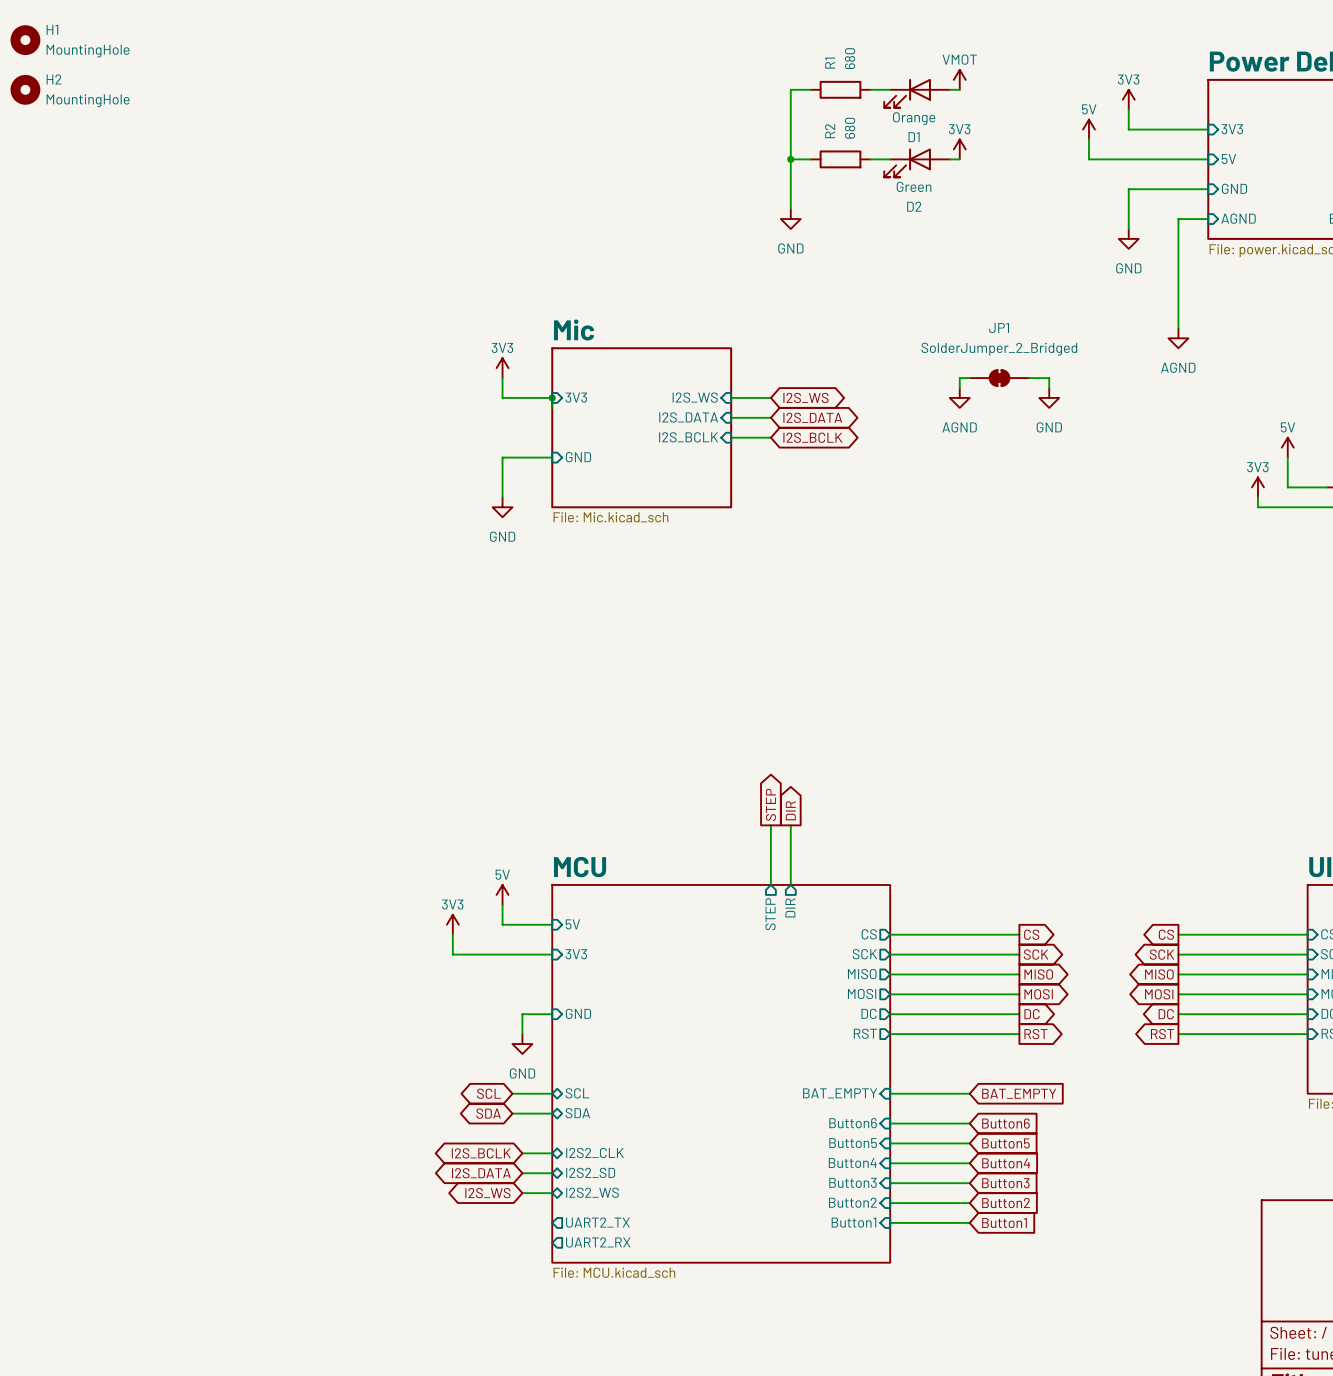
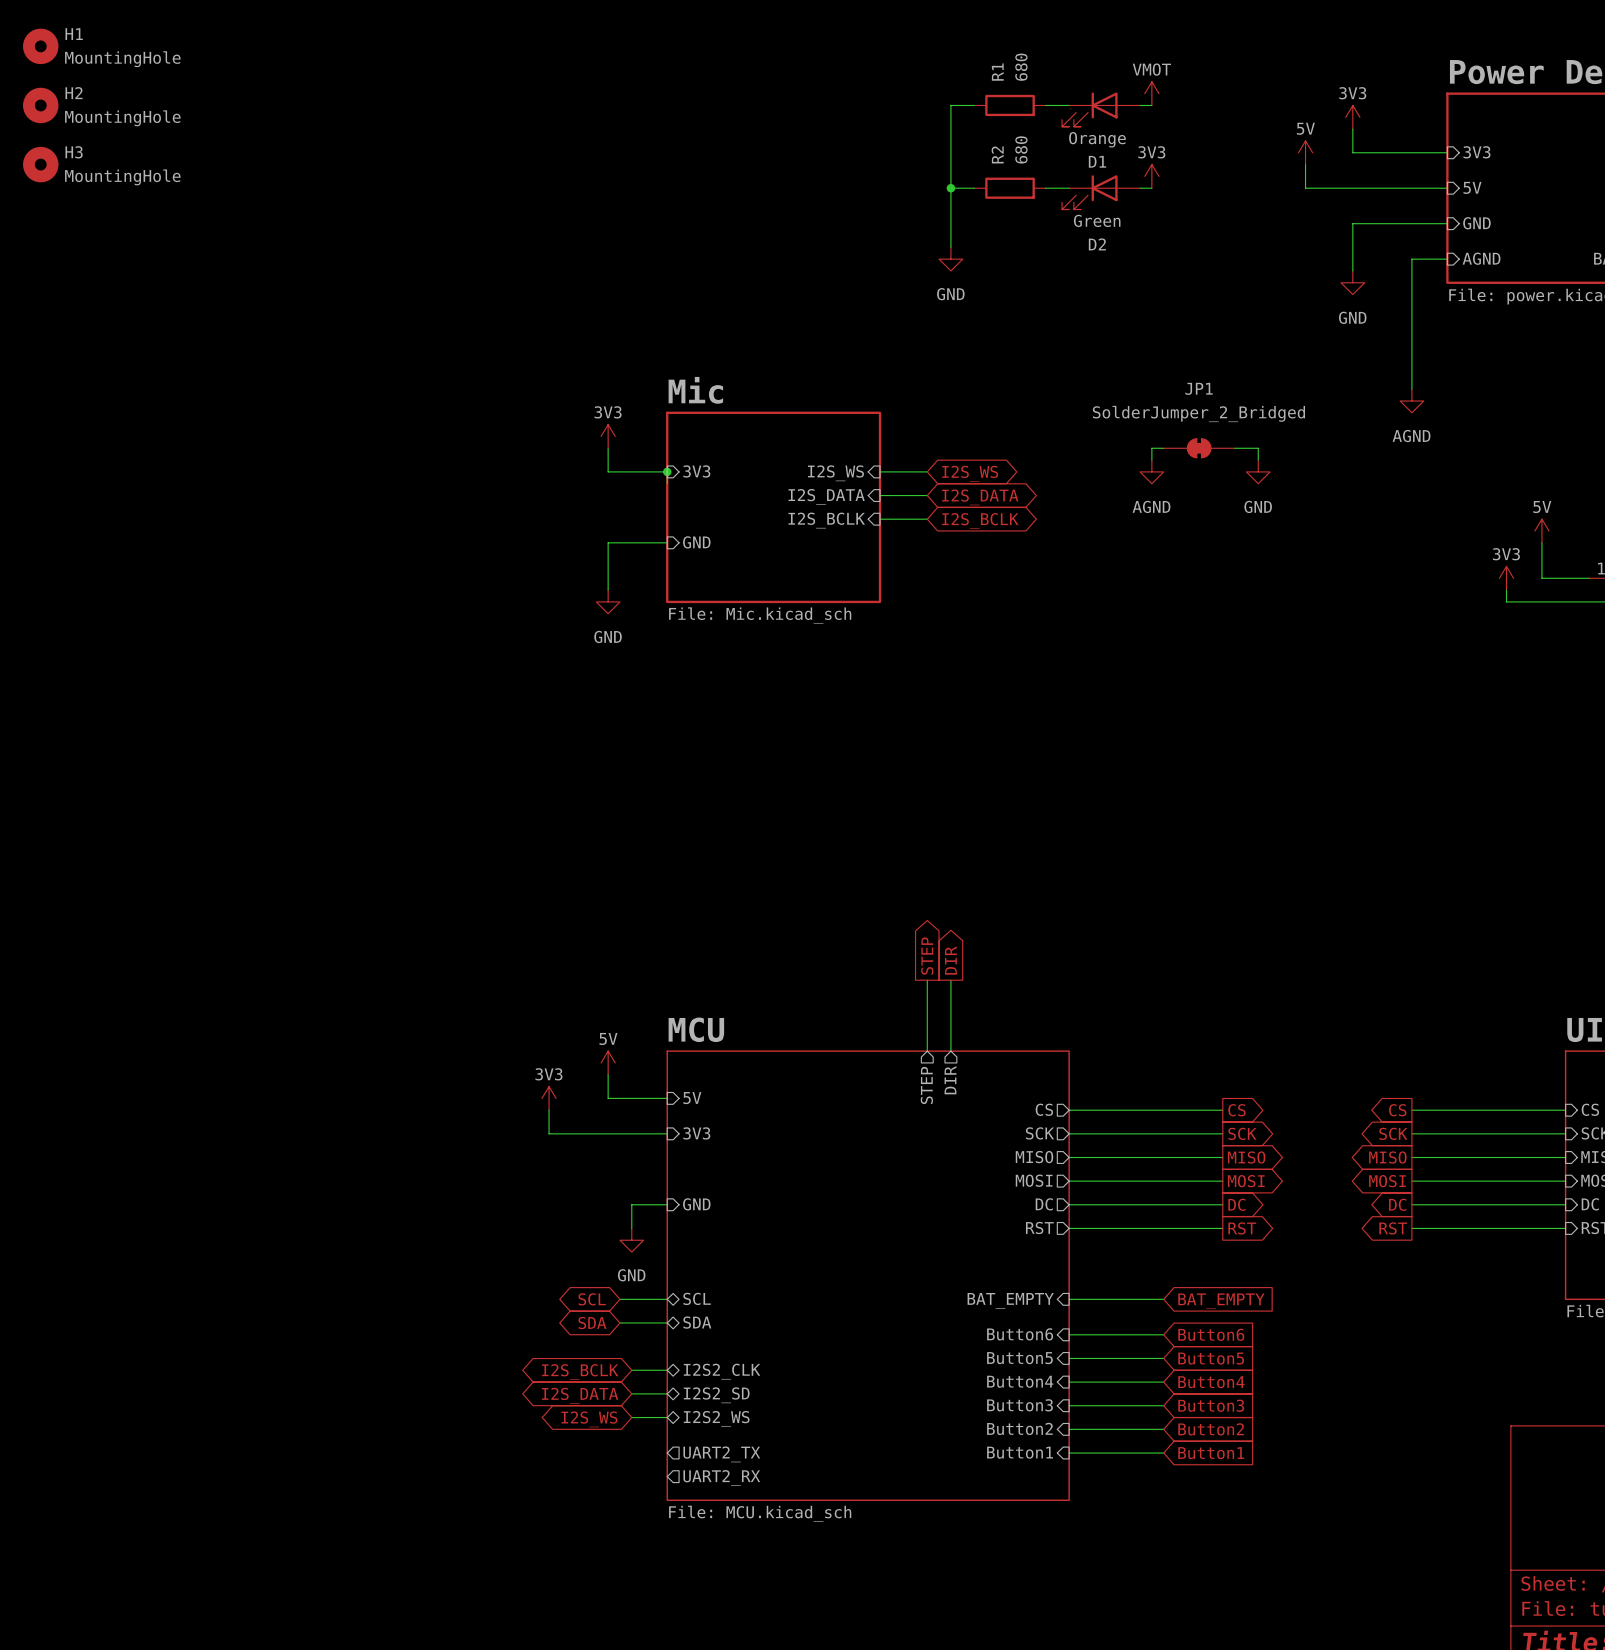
H3: none -> MountingHole (40, 164)

